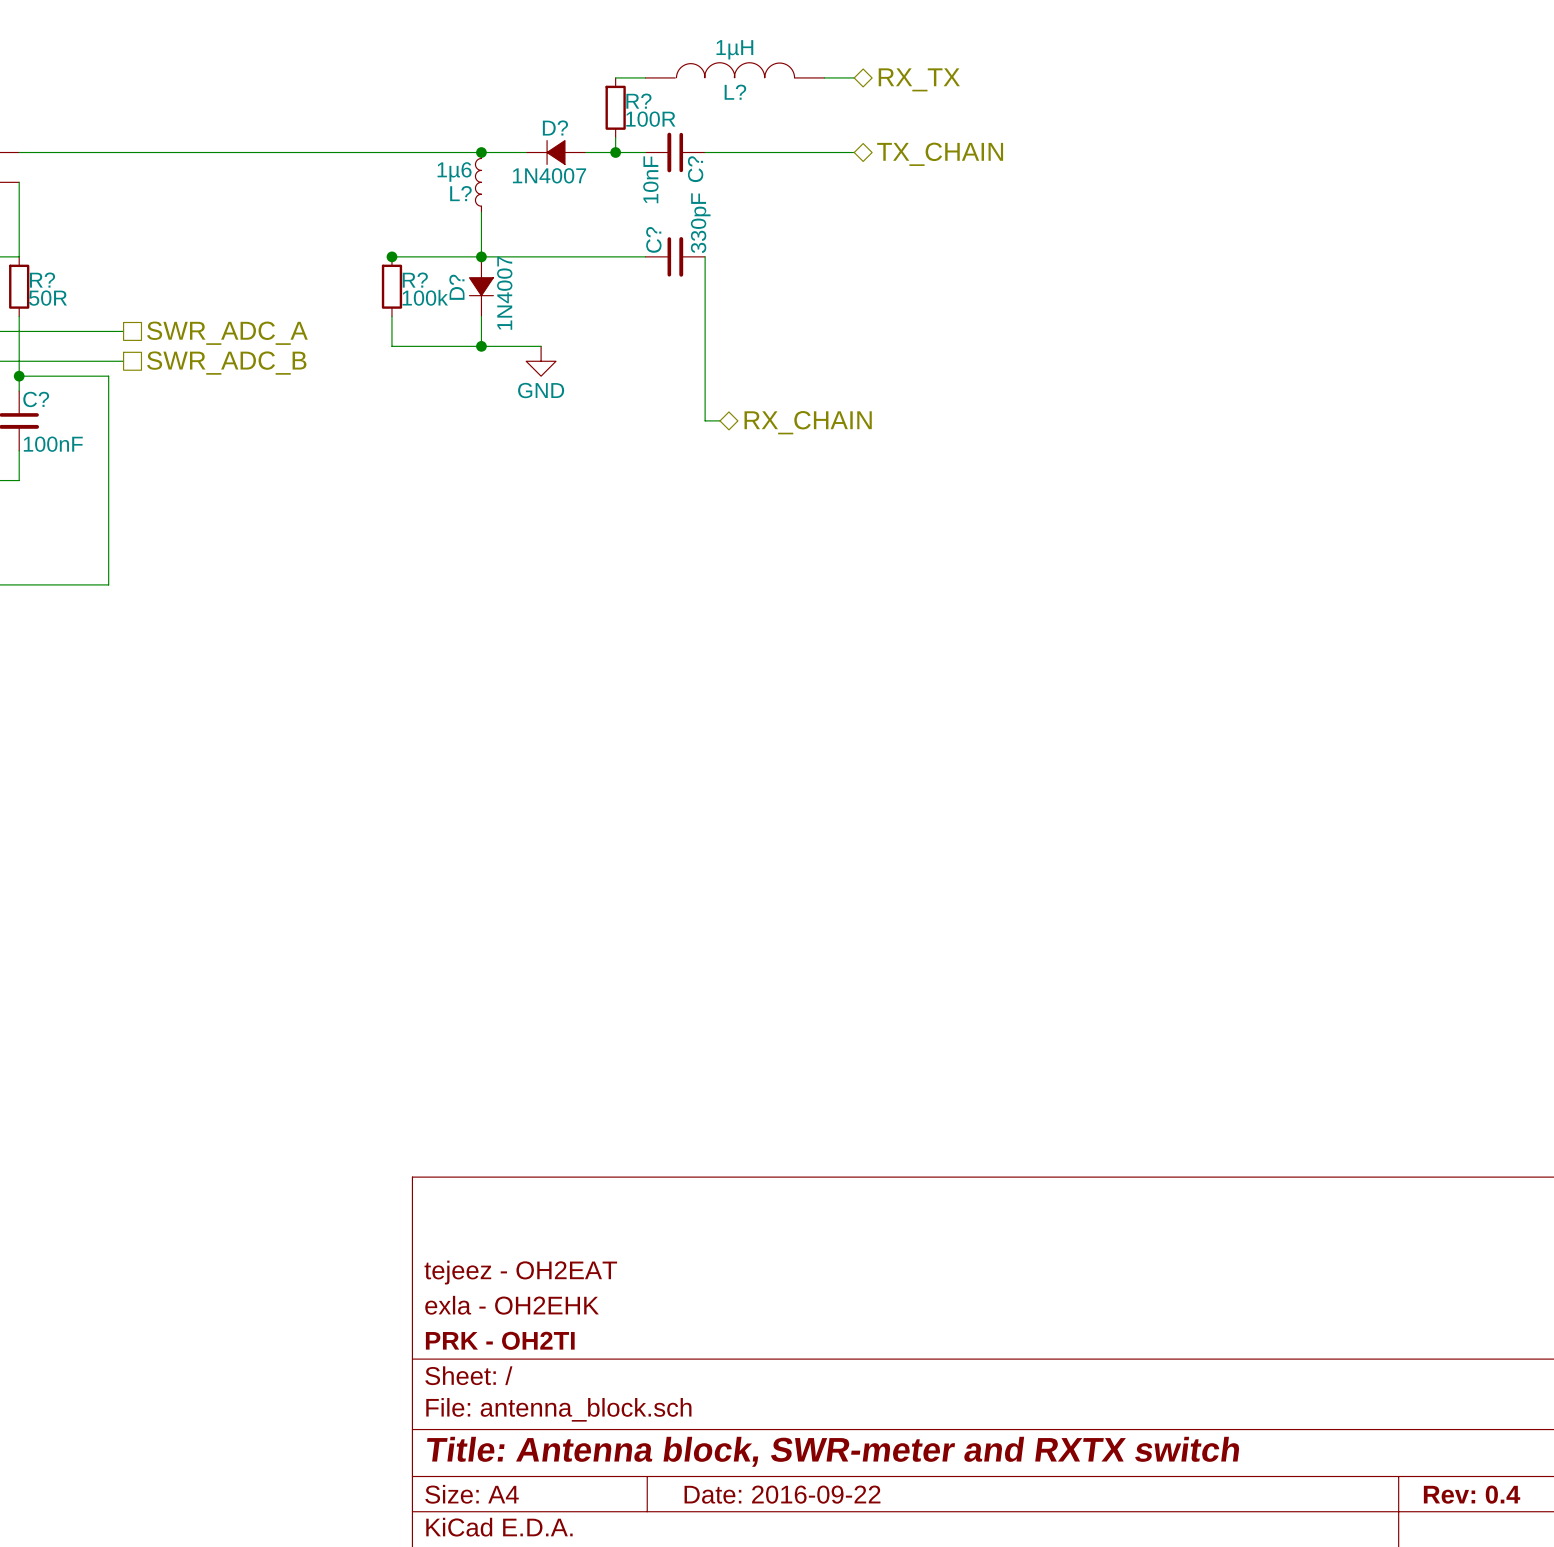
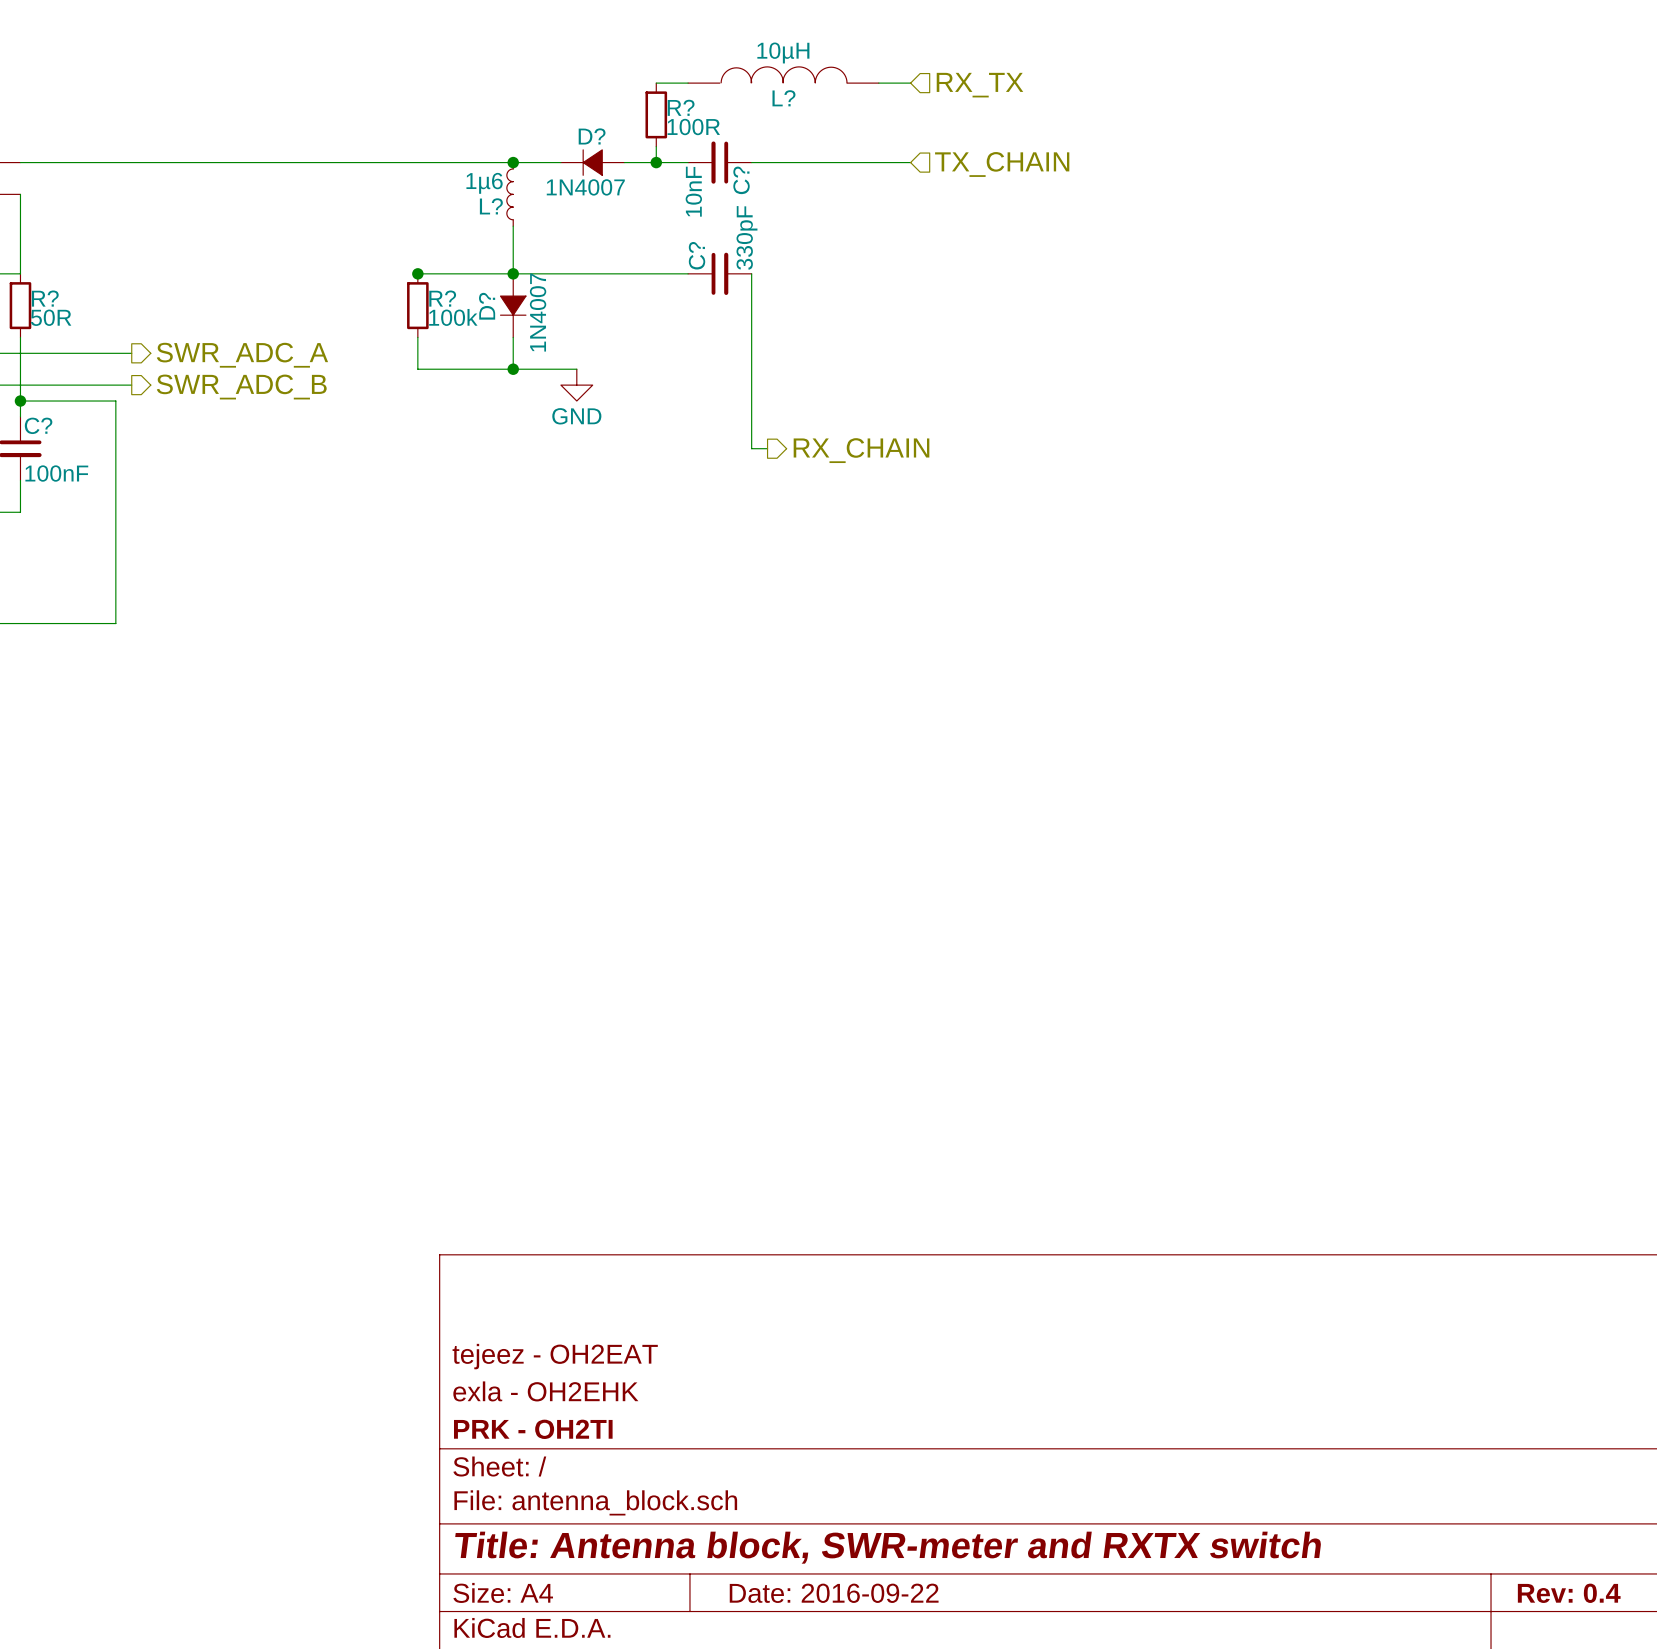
L? value: 1µH (734, 49) -> 10µH (783, 52)
hierarchical label shape: bidirectional (919, 79) -> input (979, 85)
hierarchical label shape: bidirectional (940, 154) -> input (1002, 164)
hierarchical label shape: passive (227, 333) -> output (242, 355)
hierarchical label shape: passive (226, 363) -> output (241, 387)
hierarchical label shape: bidirectional (808, 422) -> output (861, 450)

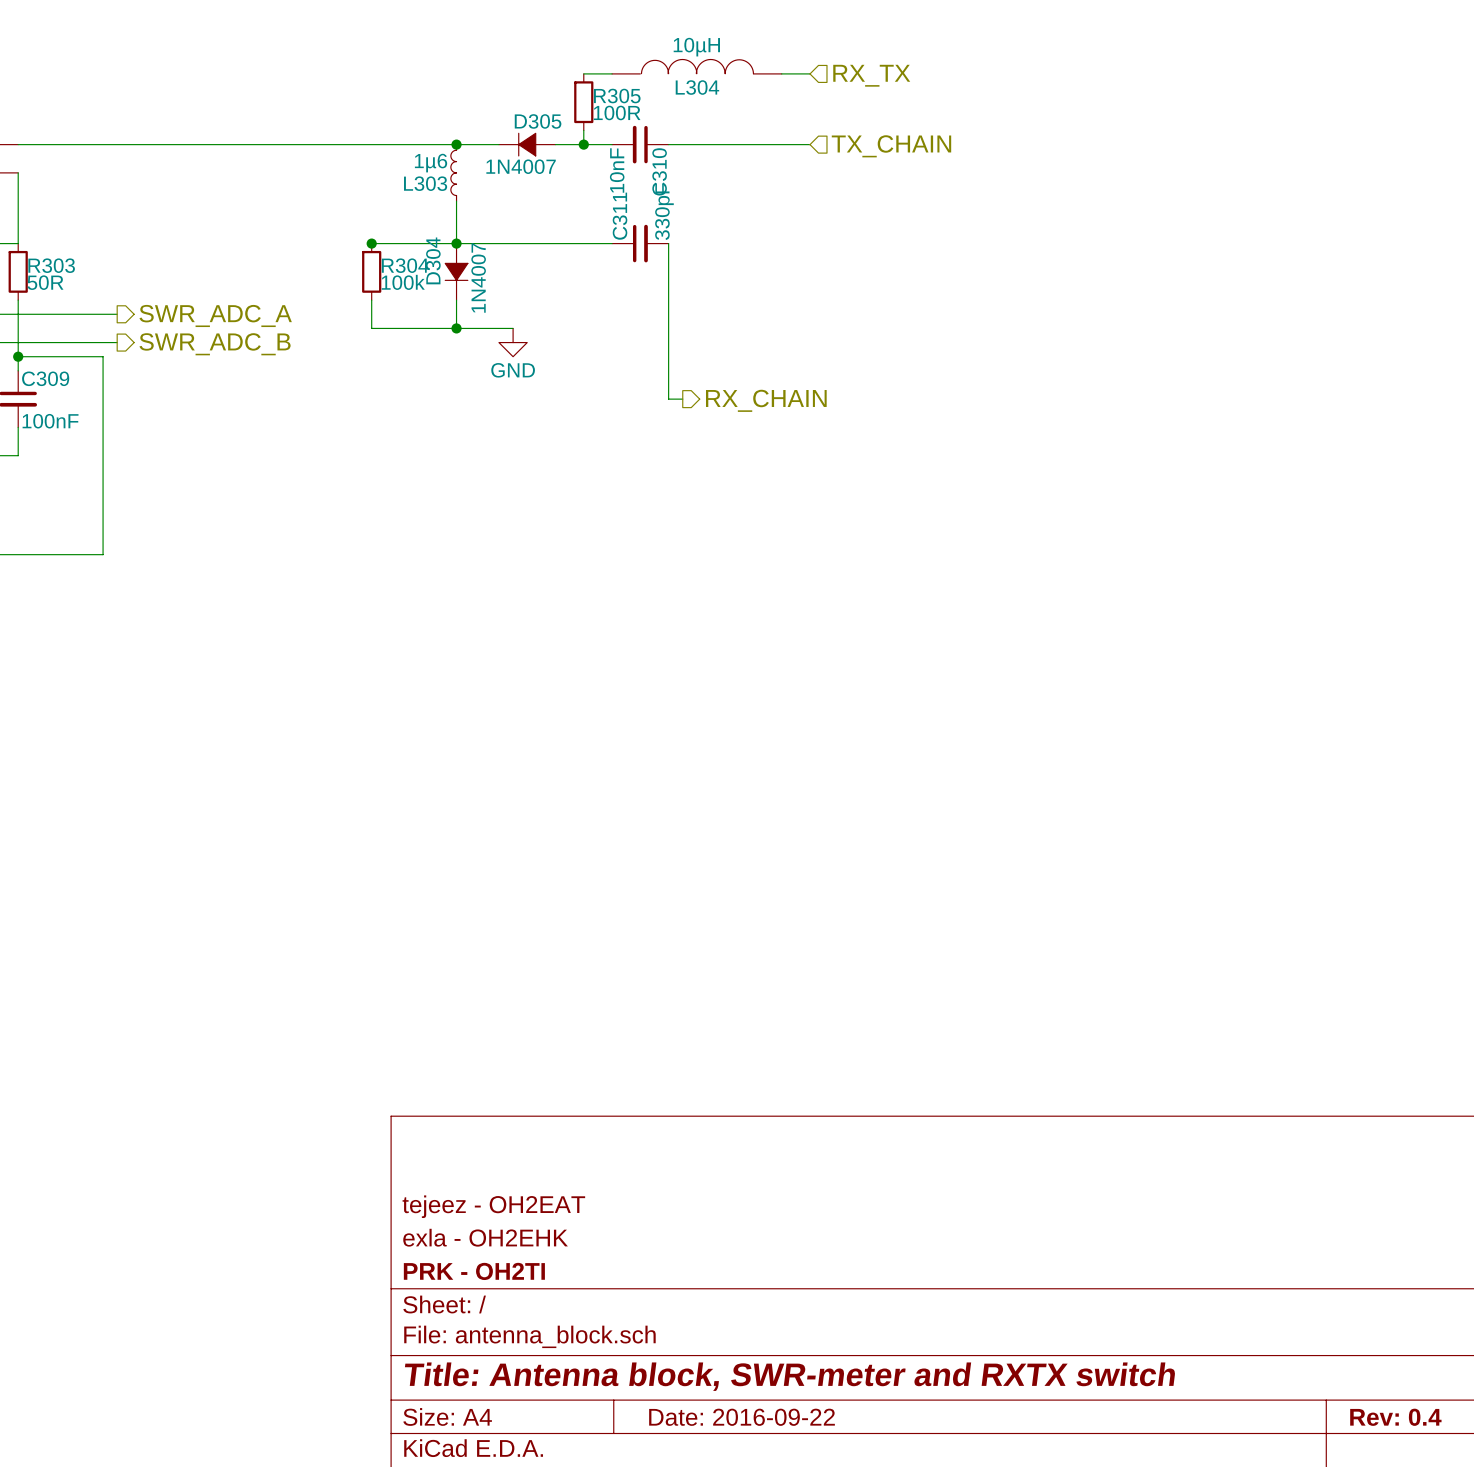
L? name: L? (783, 98) -> L304 (697, 87)
R? name: R? (681, 107) -> R305 (617, 96)
D? name: D? (592, 136) -> D305 (538, 121)
C? name: C? (741, 180) -> C310 (659, 171)
L? name: L? (491, 206) -> L303 (425, 183)
C? name: C? (697, 255) -> C311 (620, 216)
R? name: R? (45, 298) -> R303 (51, 265)
R? name: R? (442, 298) -> R304 (405, 265)
D? name: D? (487, 306) -> D304 (433, 260)
C? name: C? (38, 425) -> C309 (45, 378)

